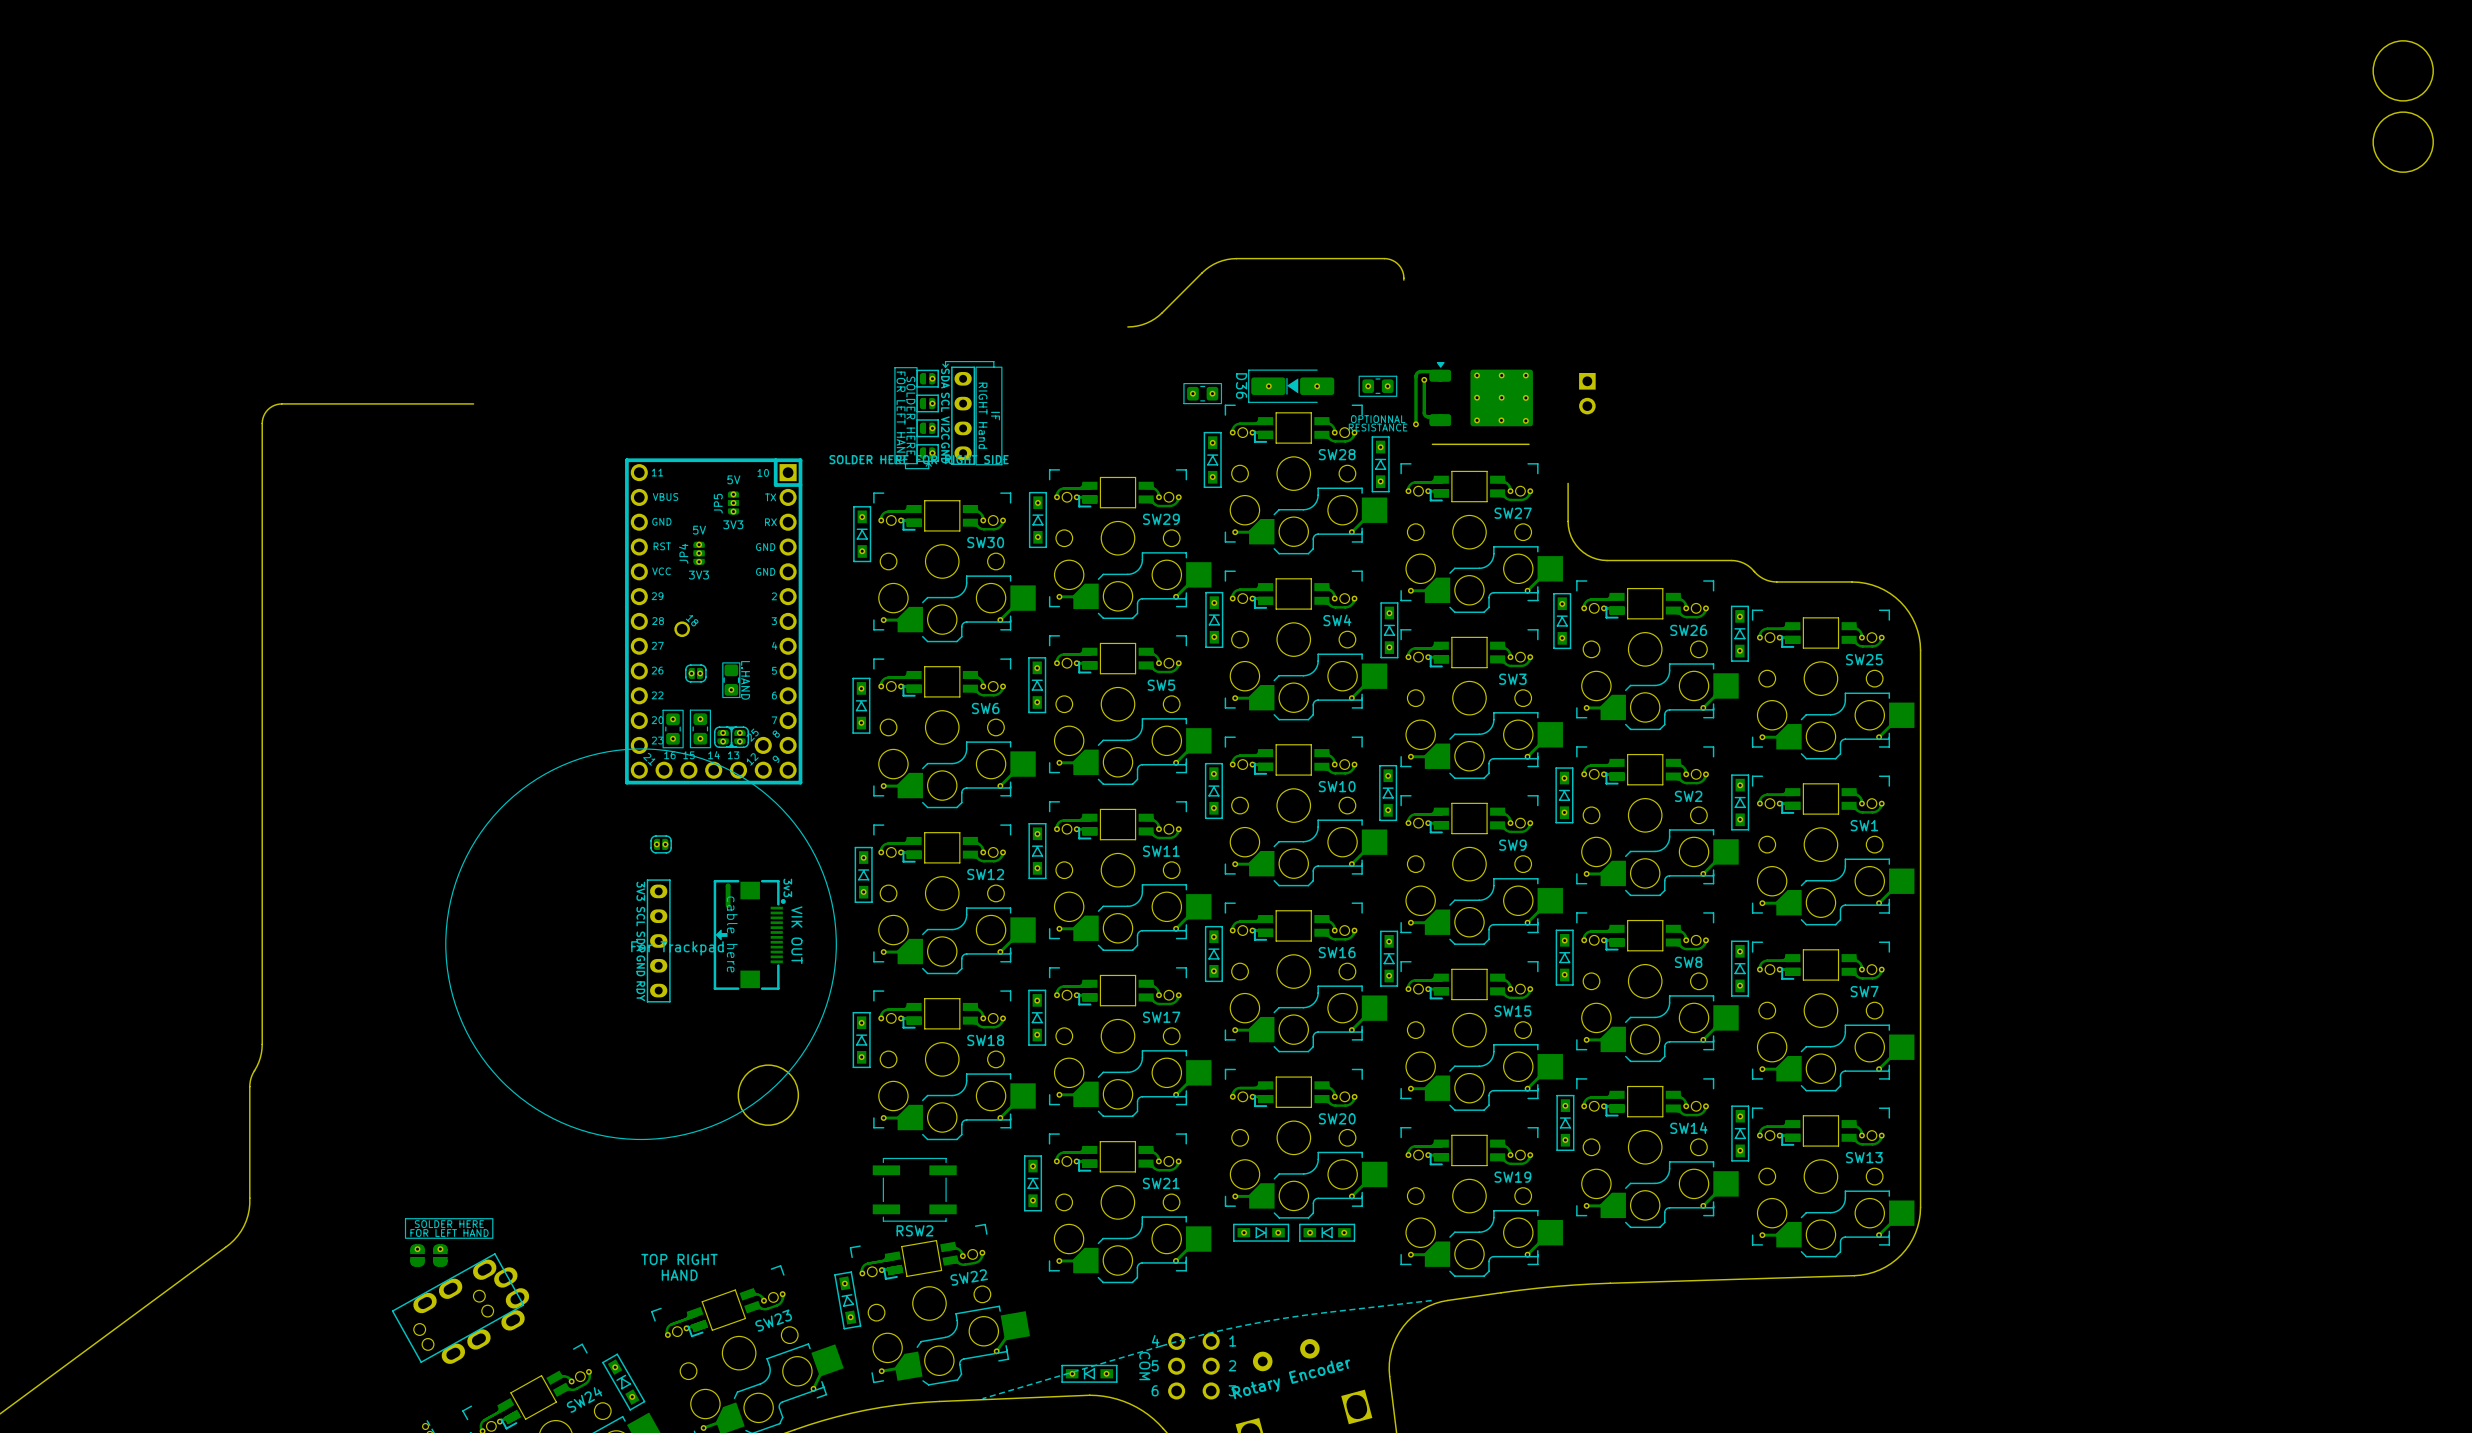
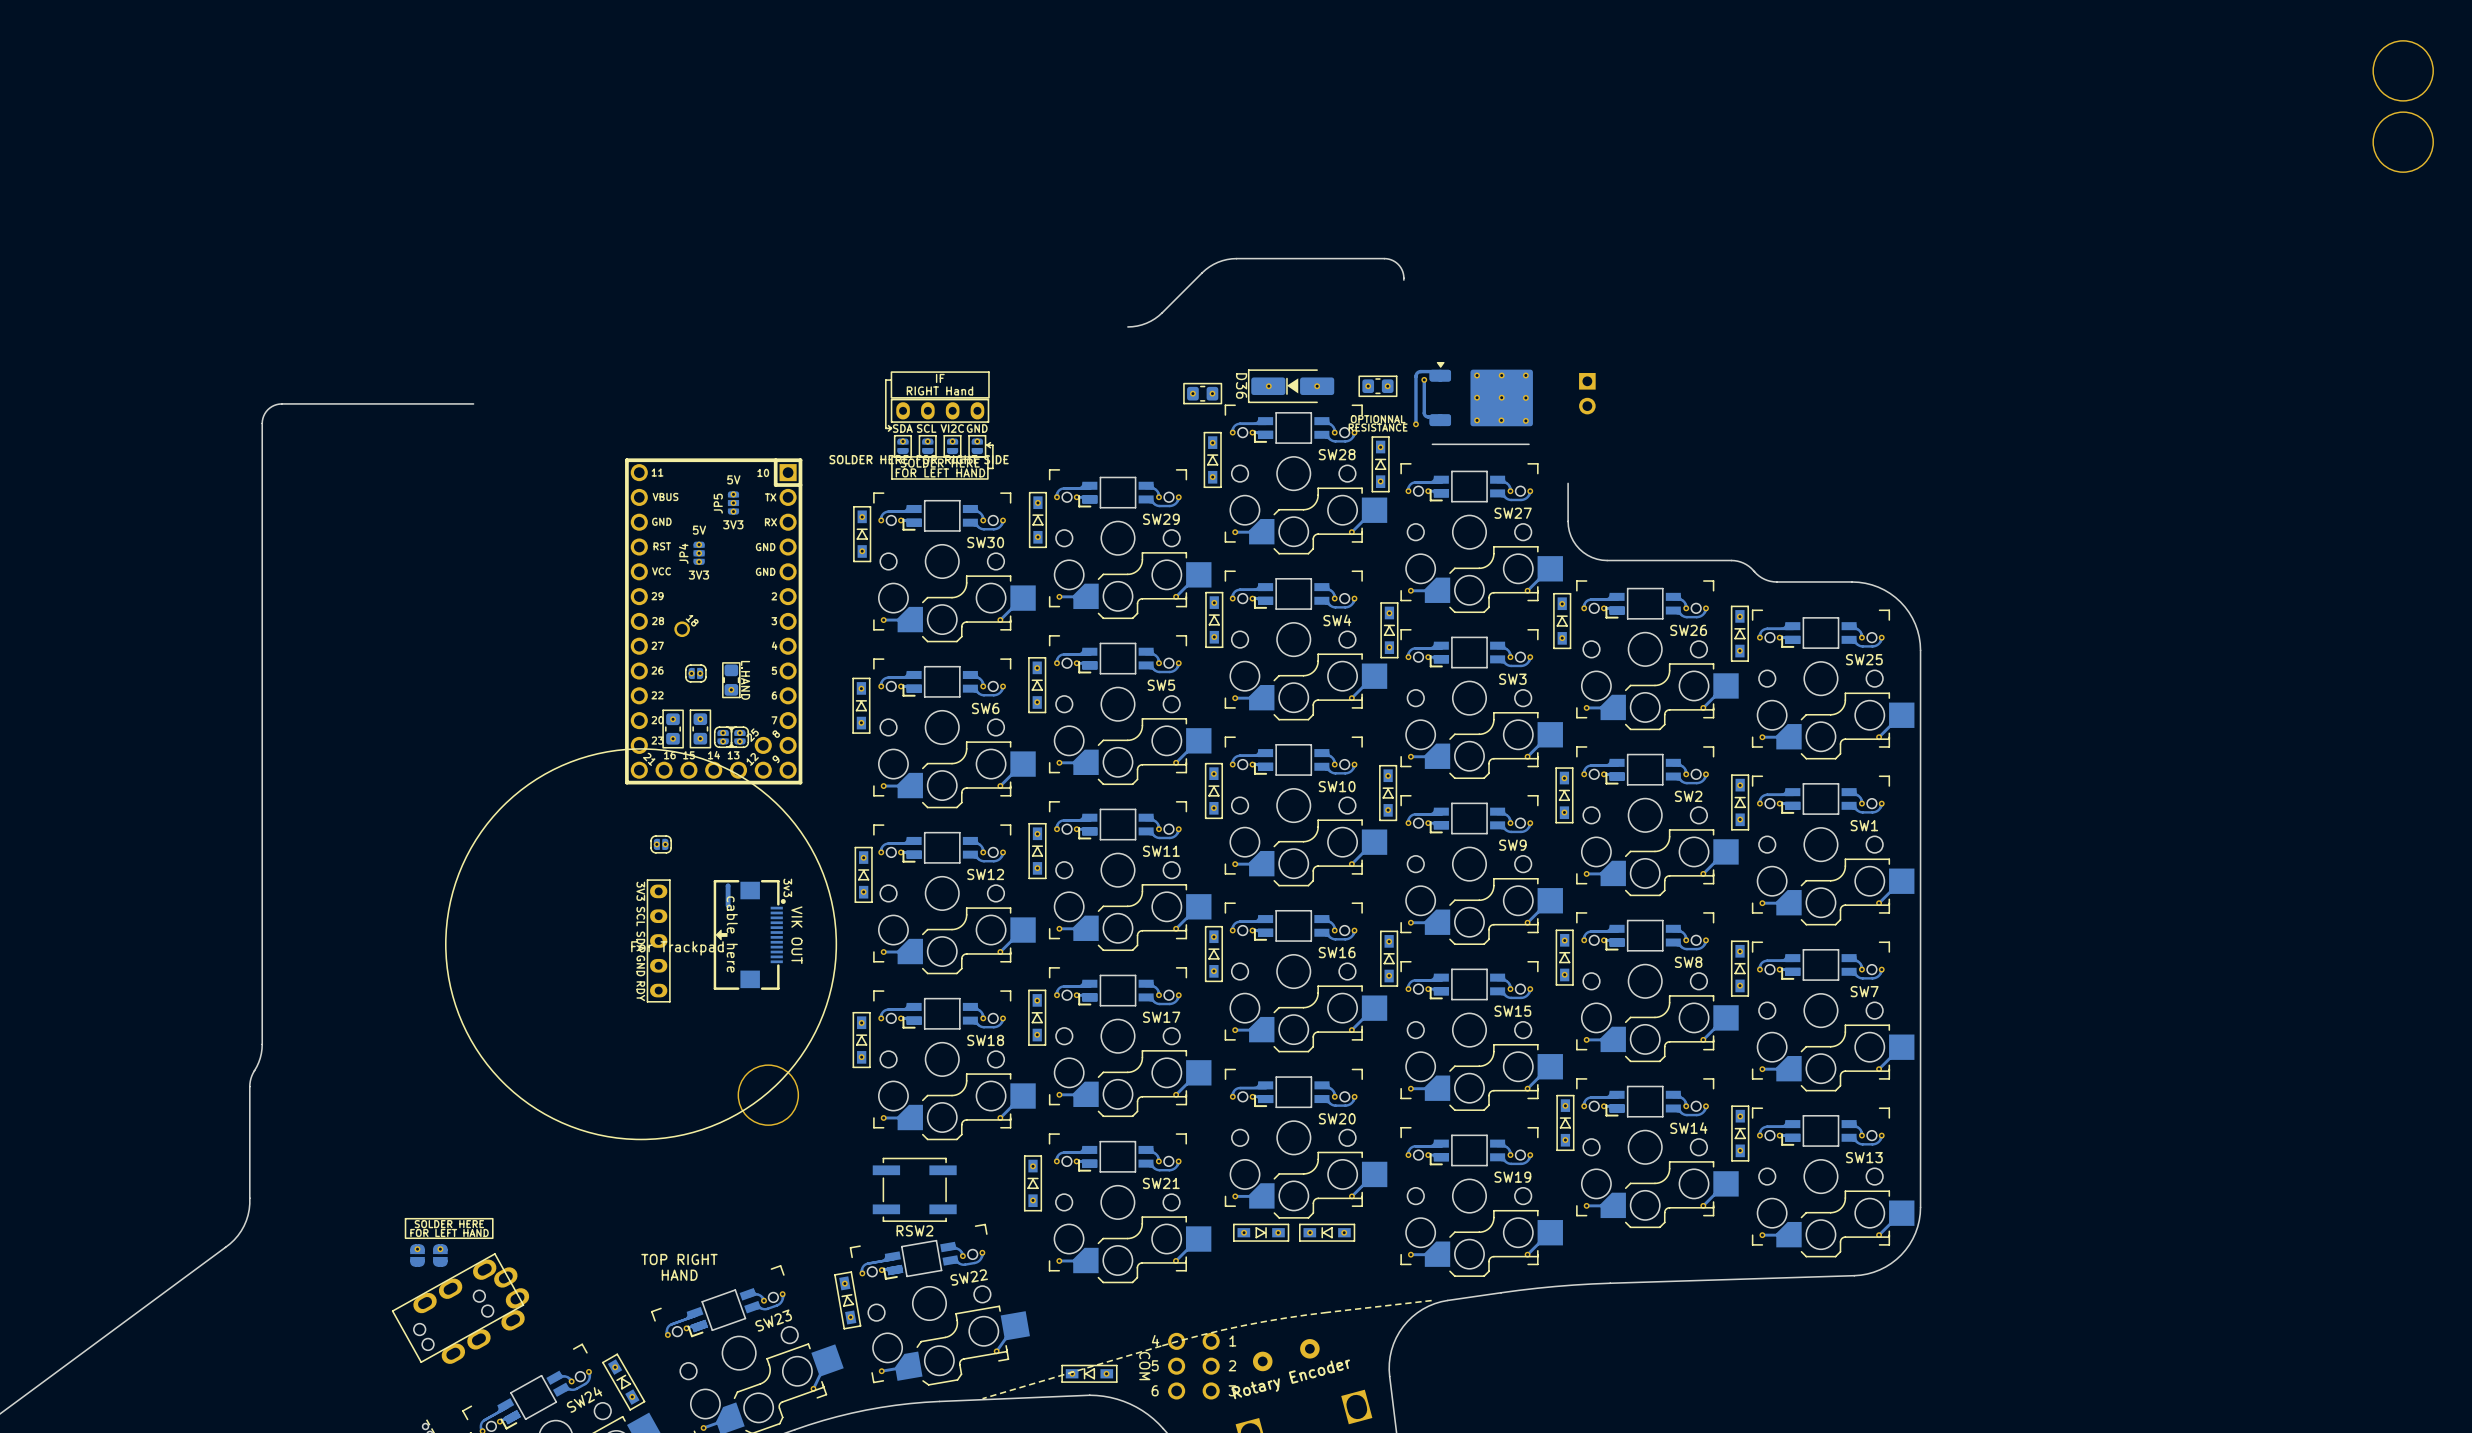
part rotation: 0° (972, 413) -> 90° counterclockwise (937, 401)
part rotation: 0° (916, 418) -> 90° counterclockwise (942, 457)

